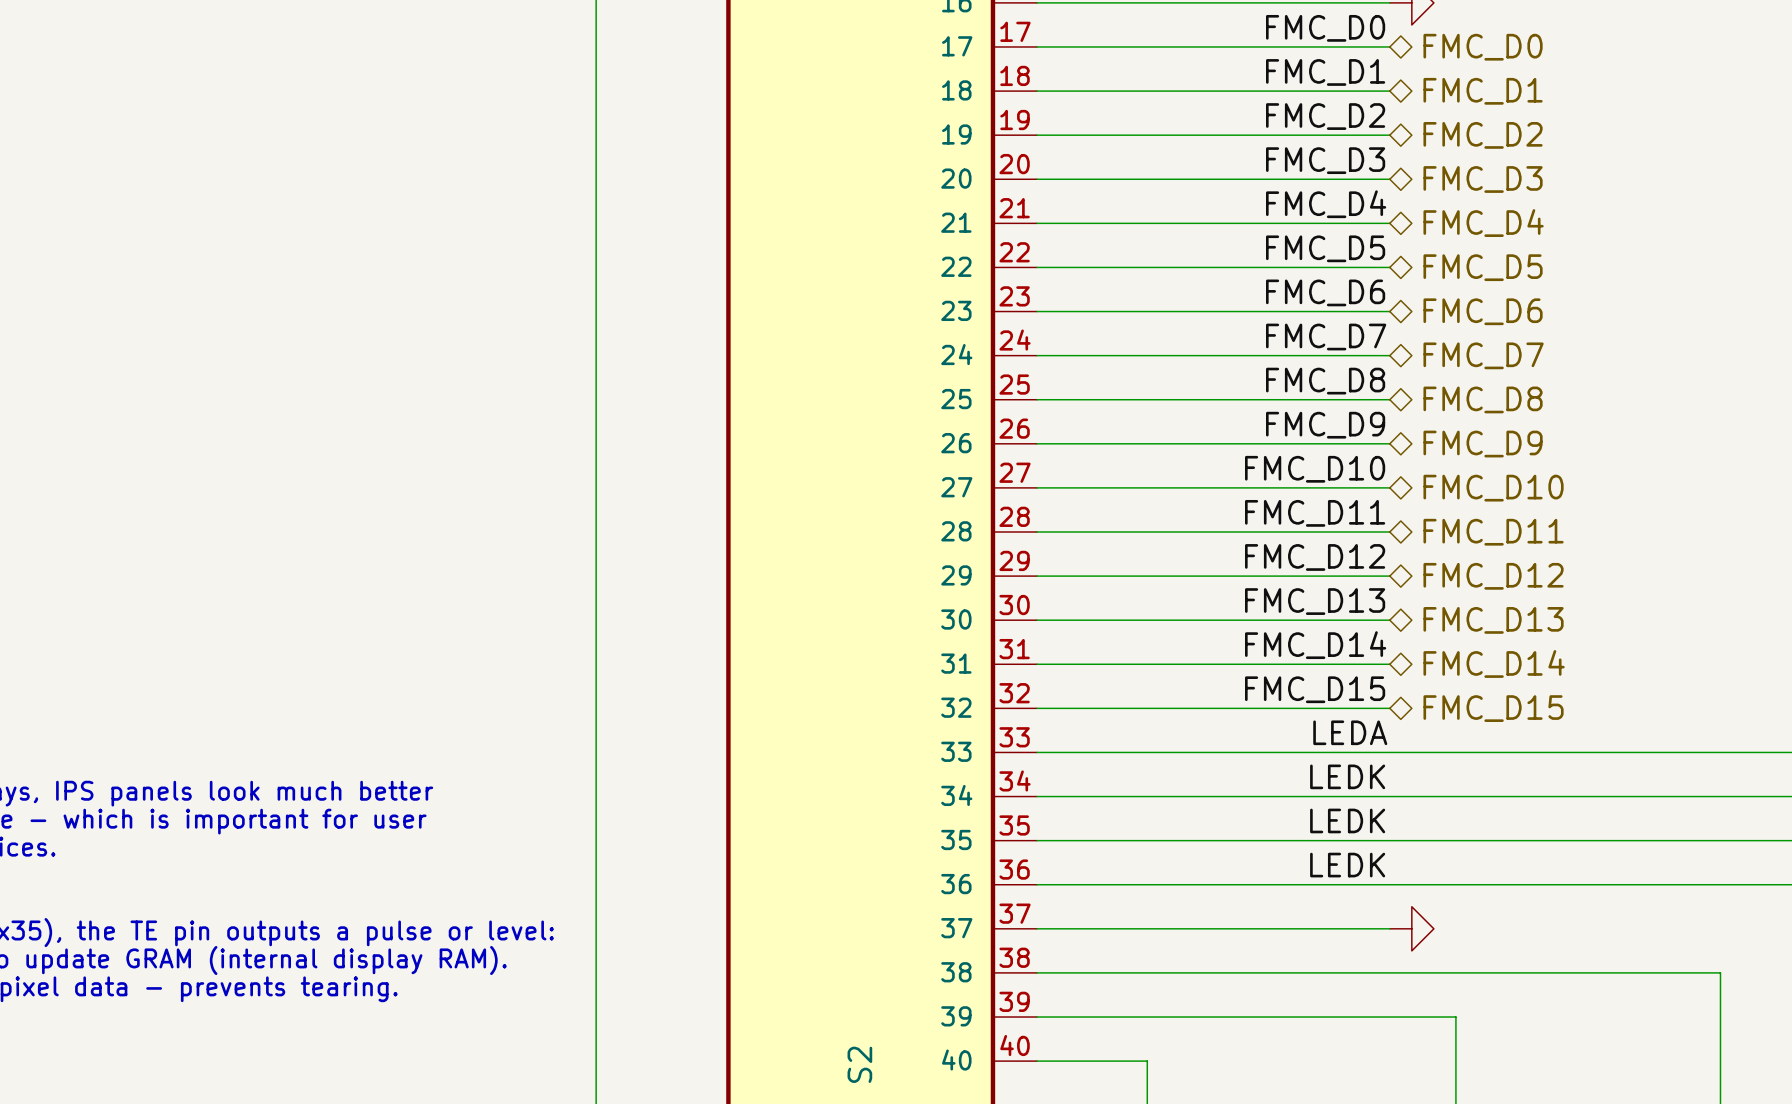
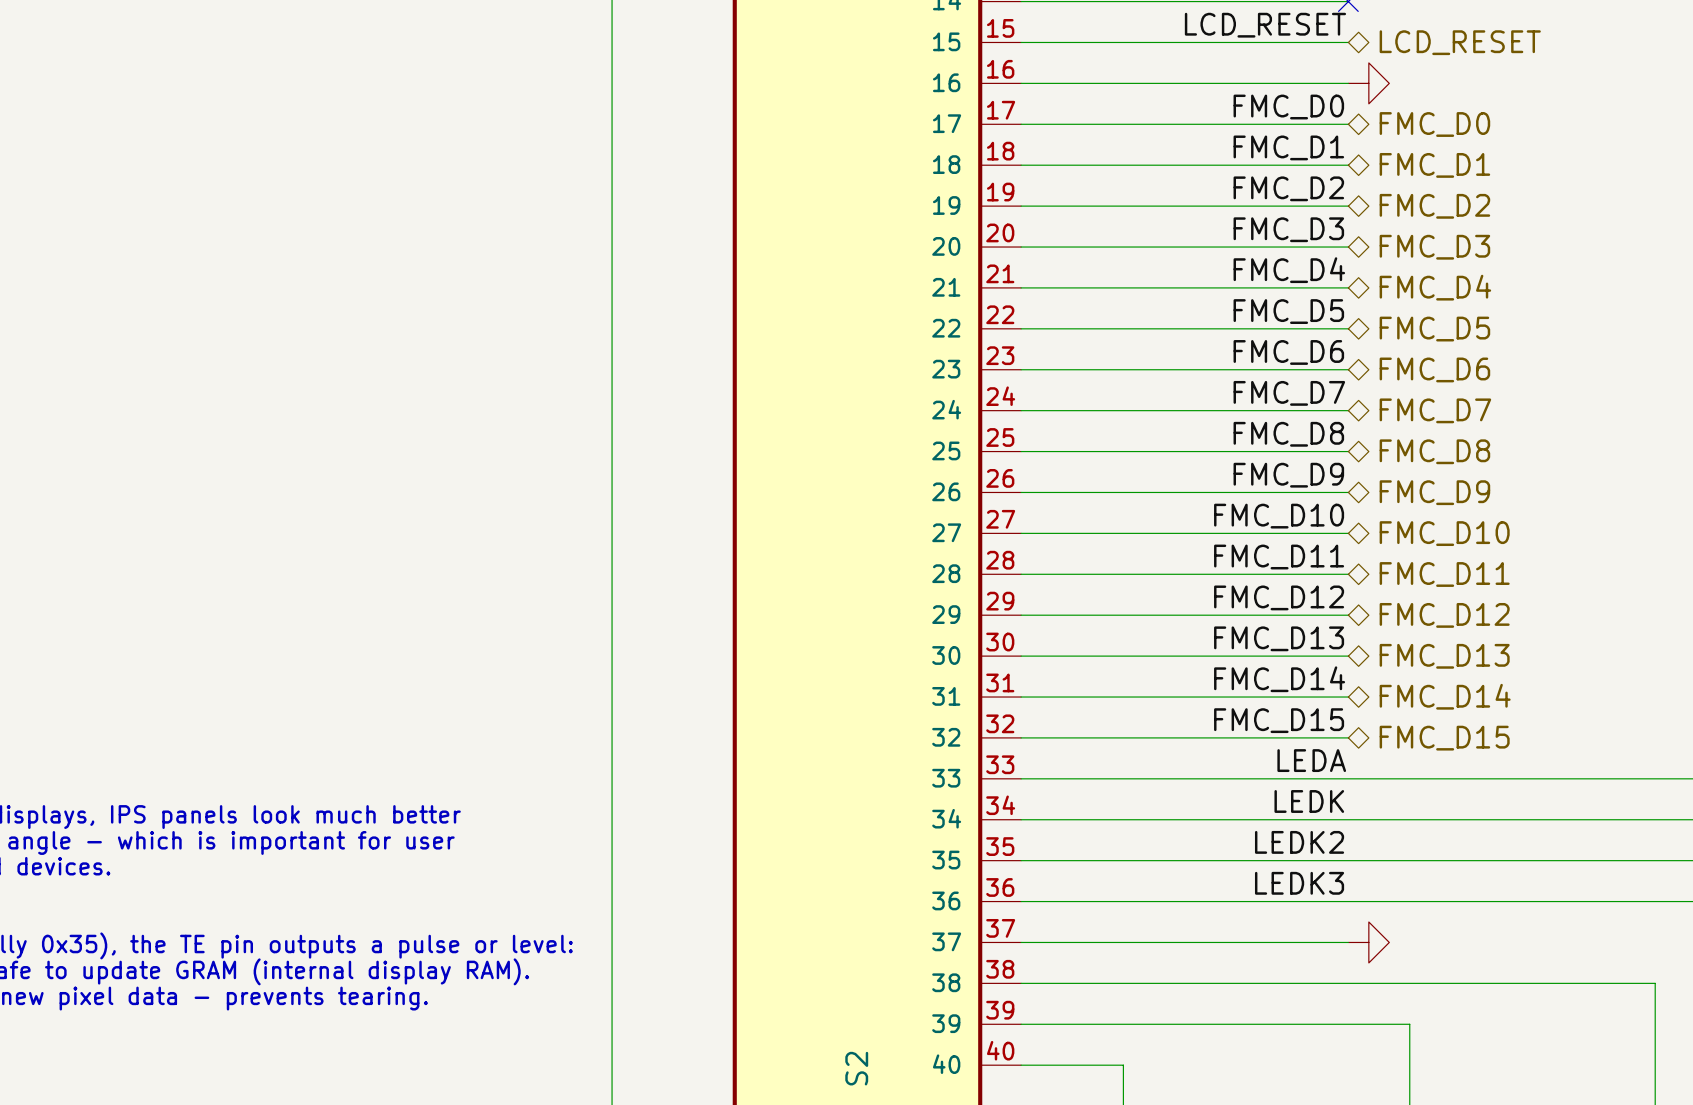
label: LEDK (1347, 820) -> LEDK2 (1299, 842)
label: LEDK (1347, 865) -> LEDK3 (1299, 883)

